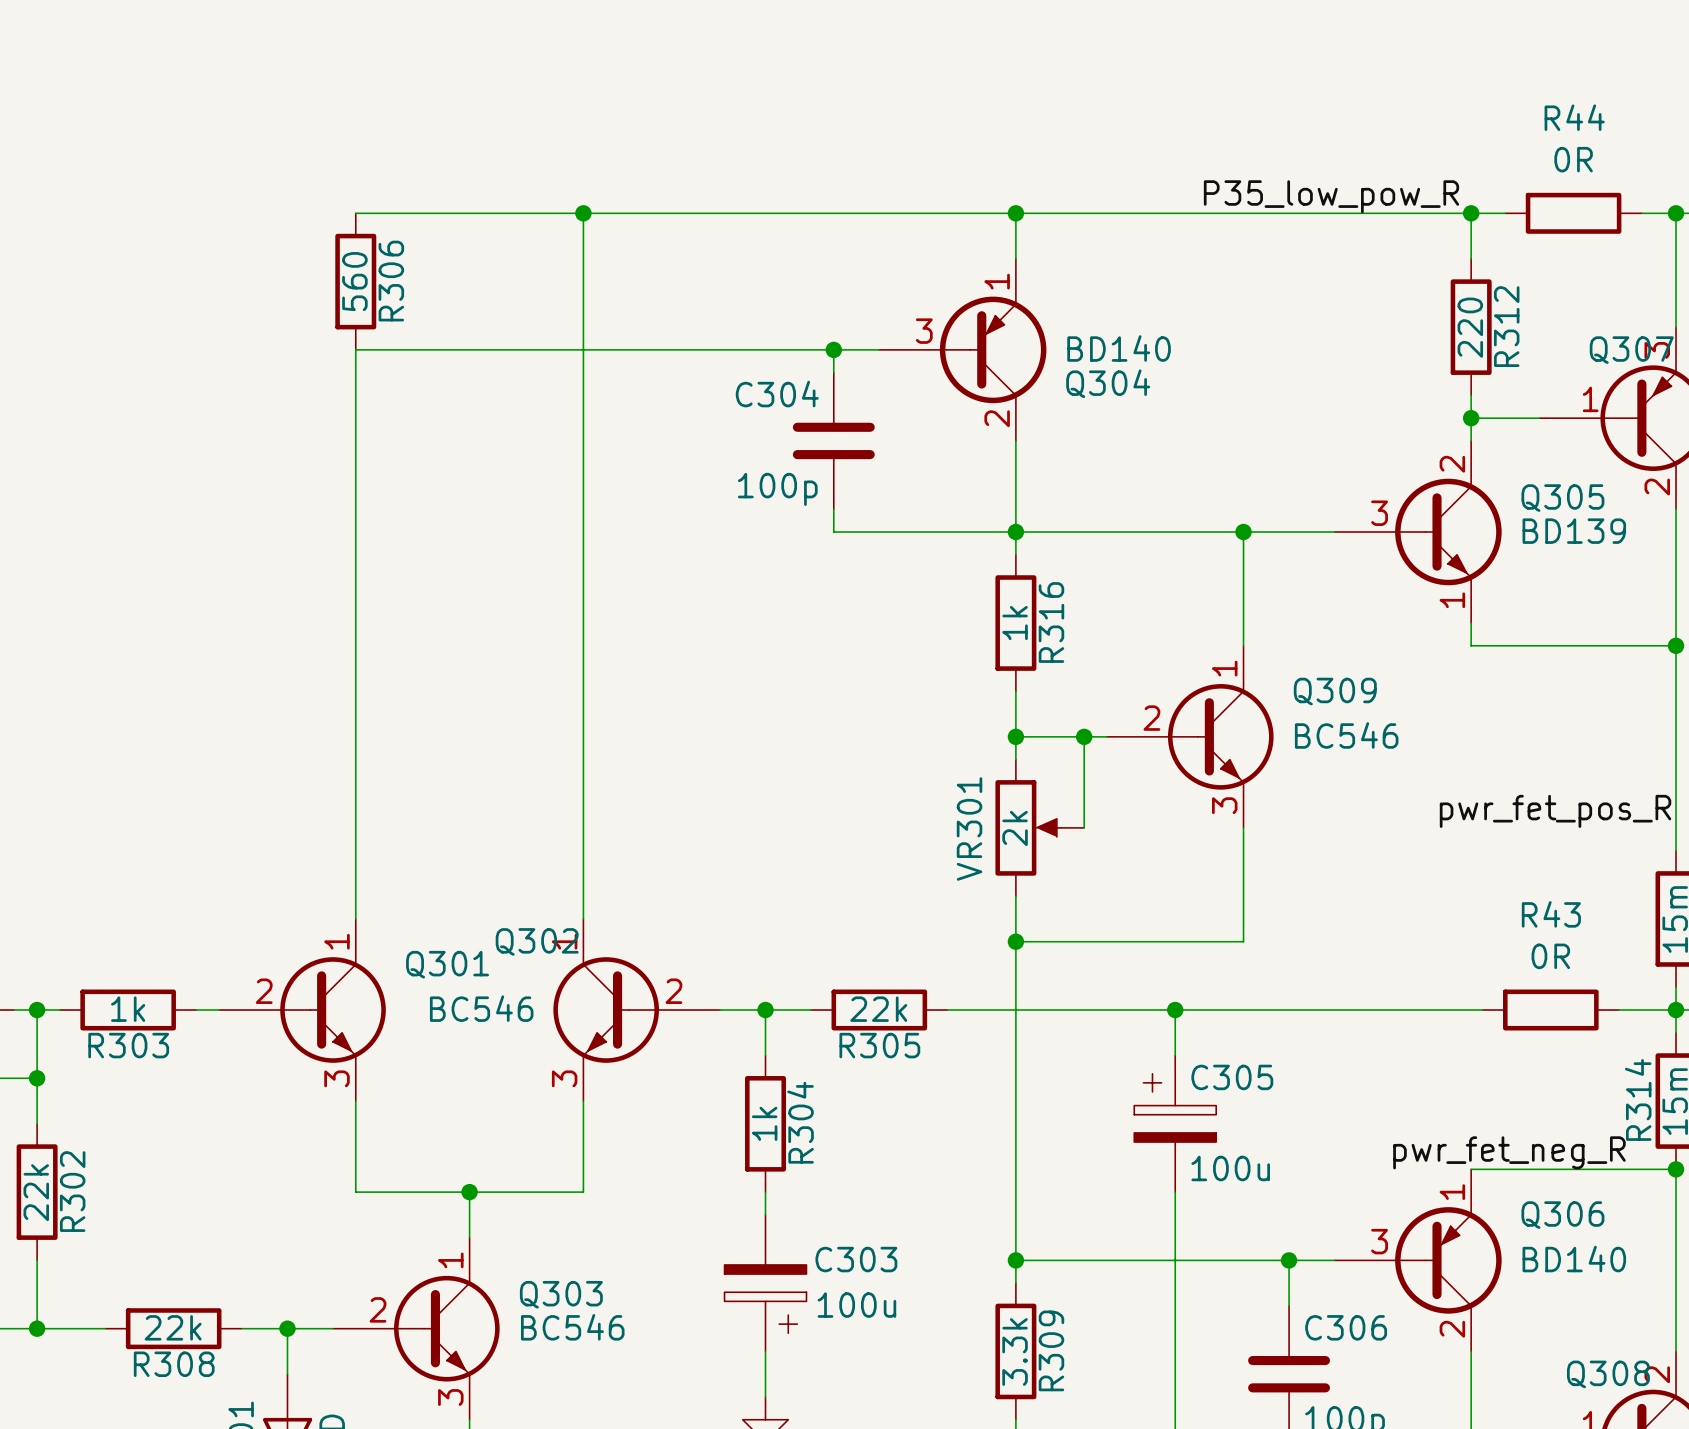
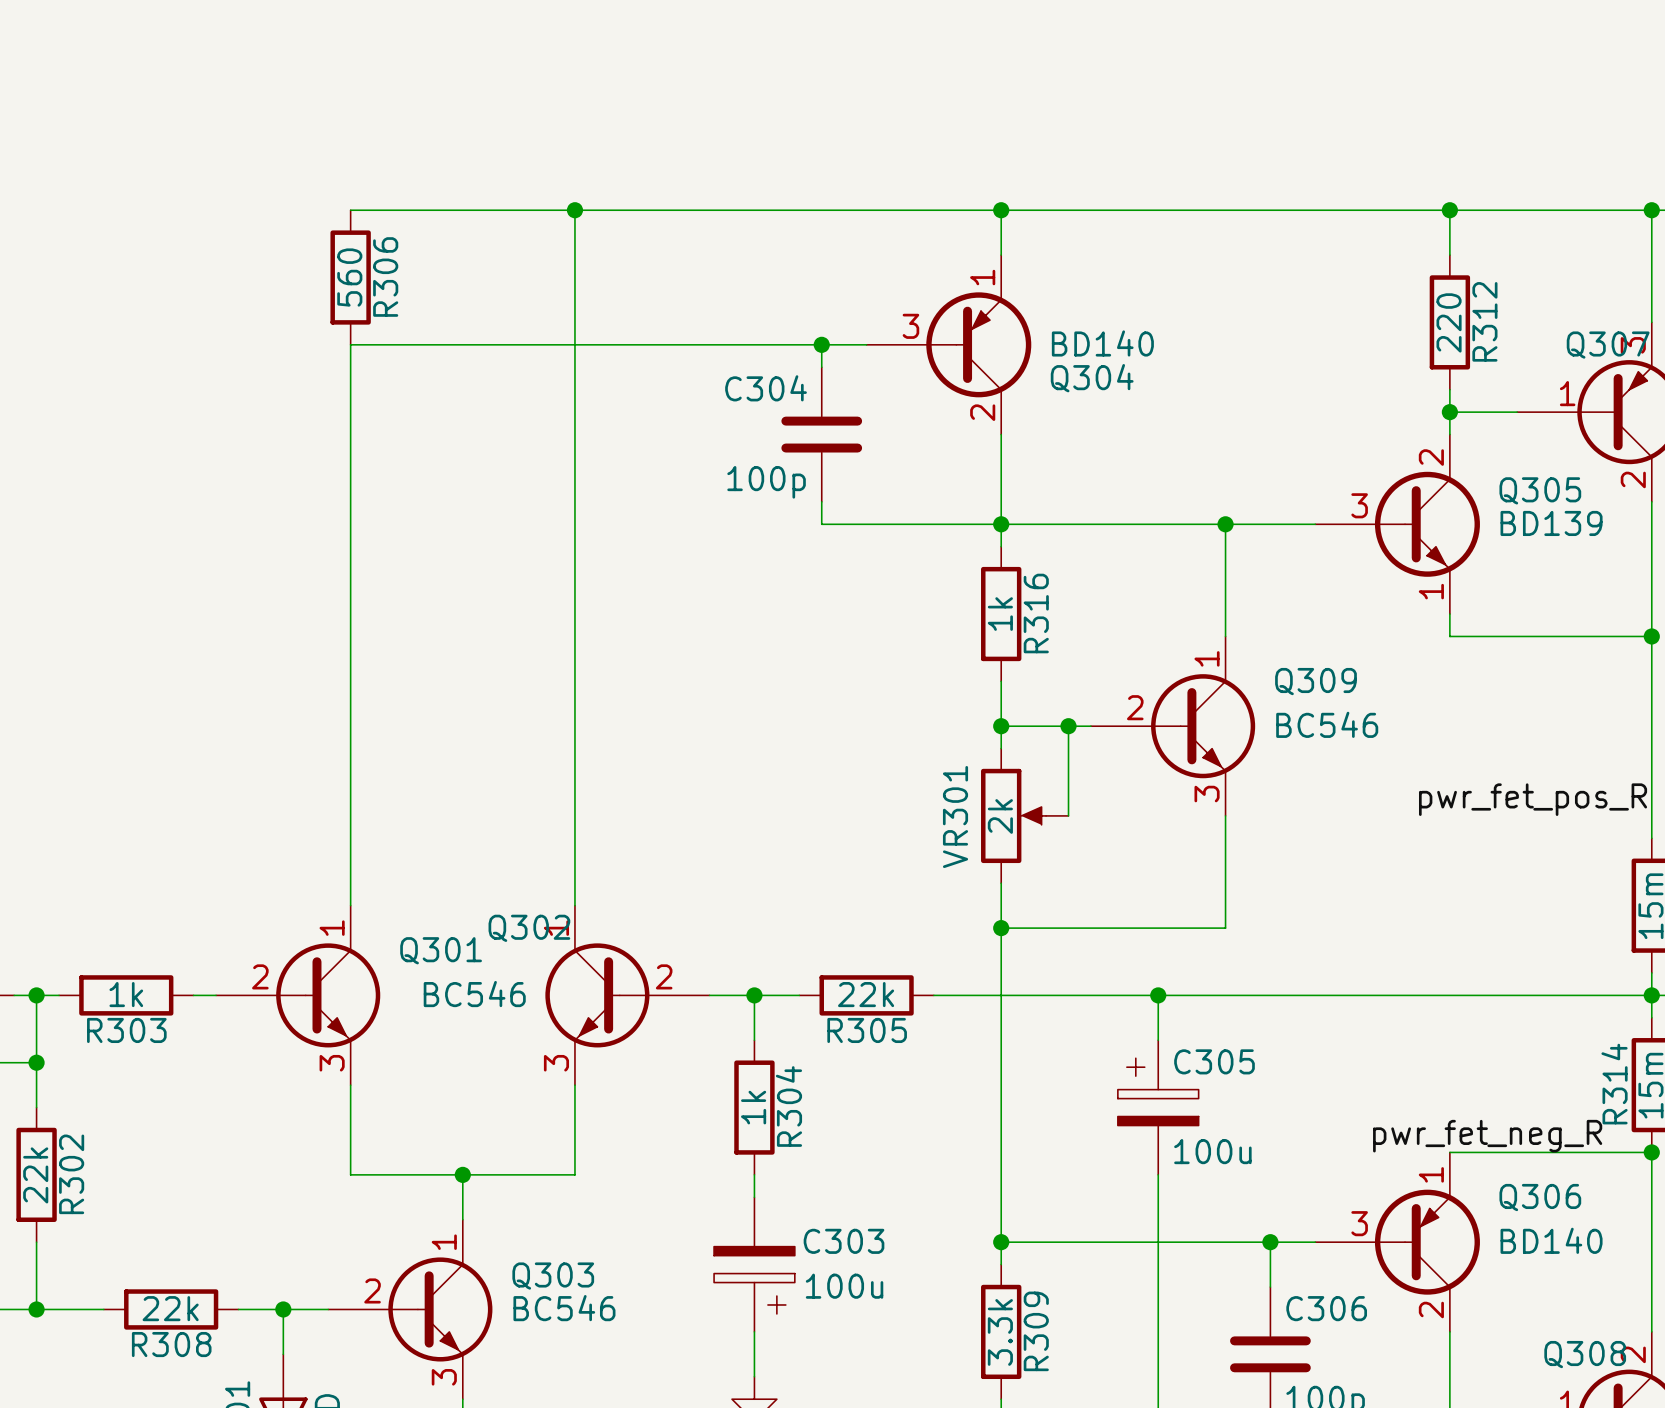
label: P35_low_pow_R (1331, 196) -> none
wire: none -> (1483, 210) (1618, 210)
R44: 0R (1573, 213) -> none
wire: none -> (1461, 995) (1595, 995)
R43: 0R (1550, 1010) -> none

